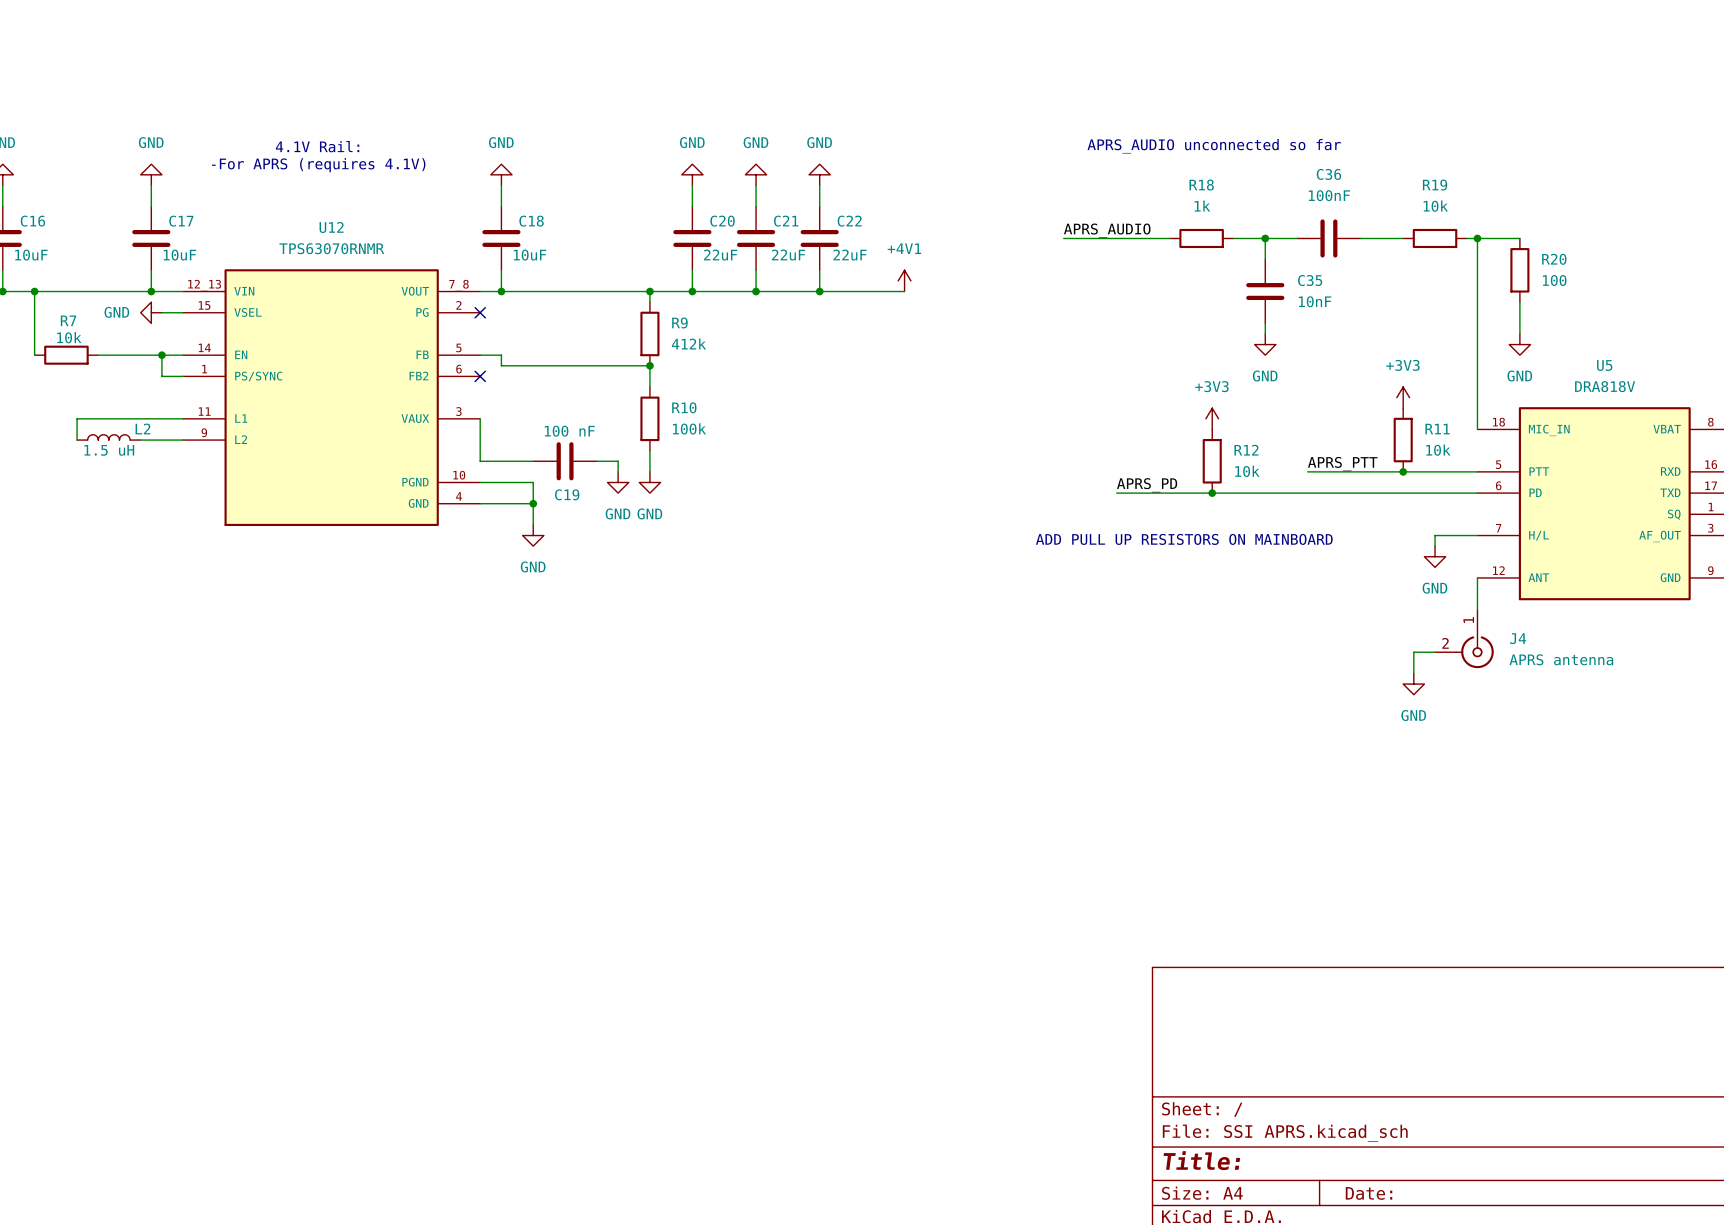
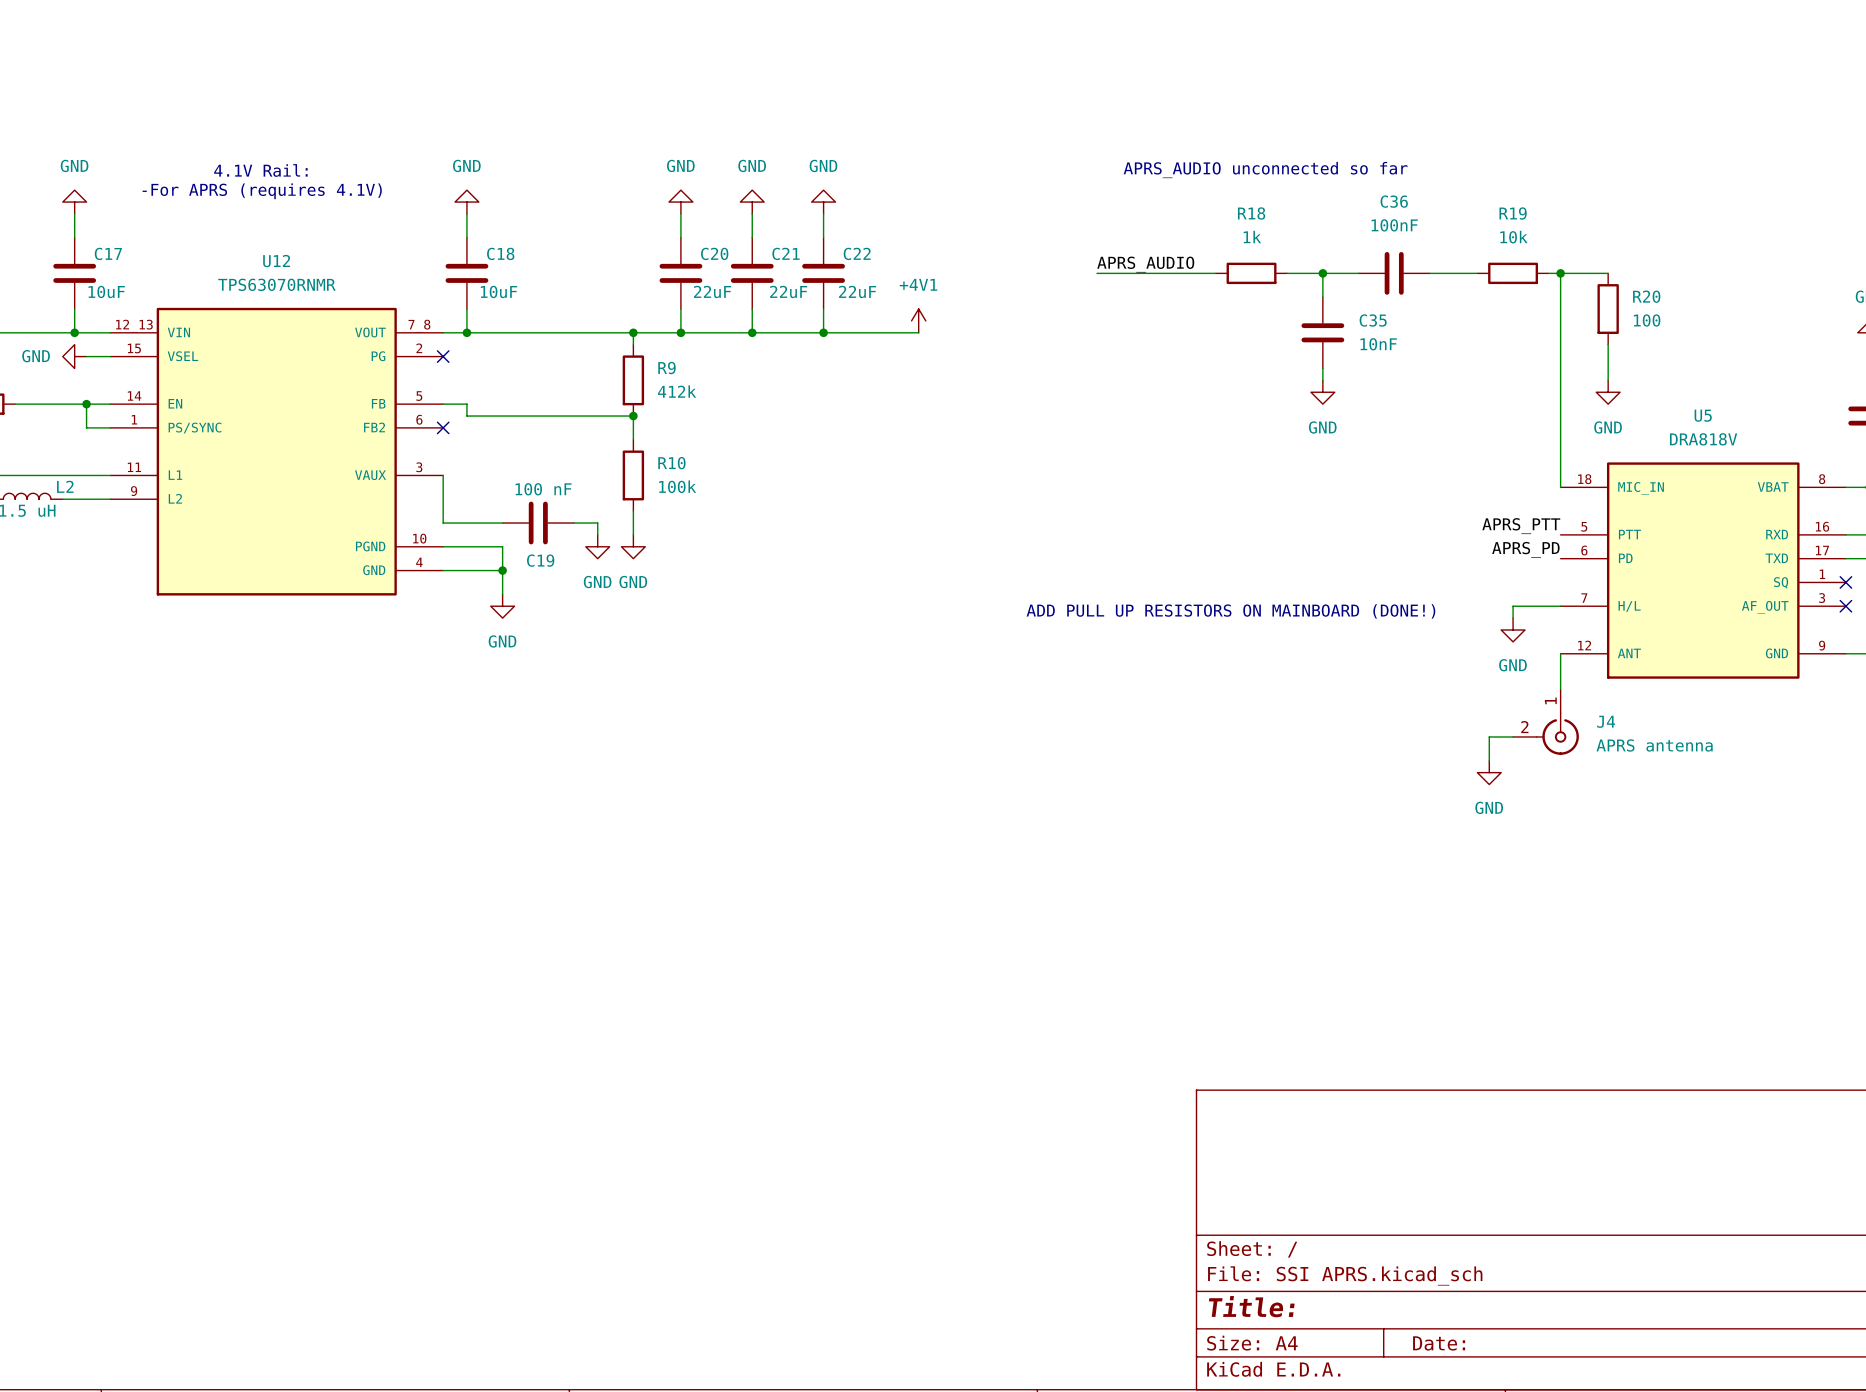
power symbol: +3V3 (1403, 397) -> none
power symbol: +3V3 (1212, 418) -> none
R11: 10k (1403, 440) -> none
R12: 10k (1212, 461) -> none
label position: APRS_PTT (1342, 464) -> APRS_PTT (1521, 526)
wire: (1307, 471) (1477, 471) -> none
junction: (1403, 471) -> none
label: APRS_PD (1147, 485) -> none
label: none -> APRS_PD (1525, 549)
wire: (1116, 493) (1477, 493) -> none
junction: (1212, 493) -> none
text: ADD PULL UP RESISTORS ON MAINBOARD (1184, 539) -> ADD PULL UP RESISTORS ON MAINBOARD (DONE!) (1230, 611)

